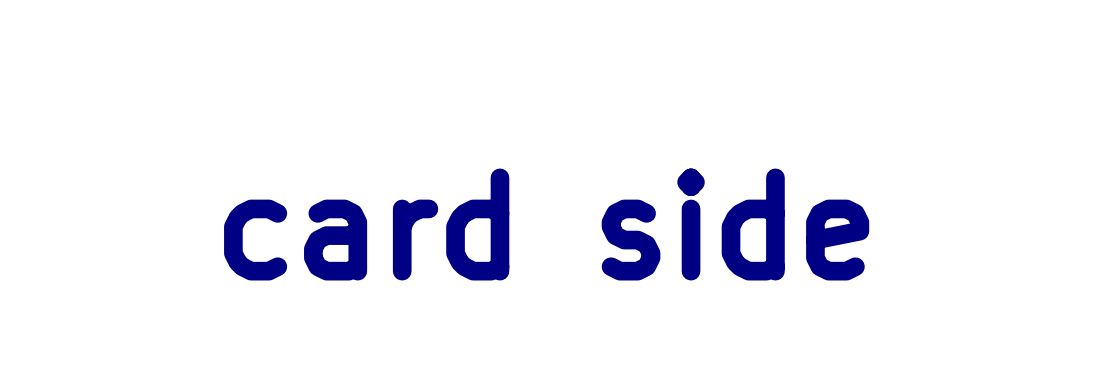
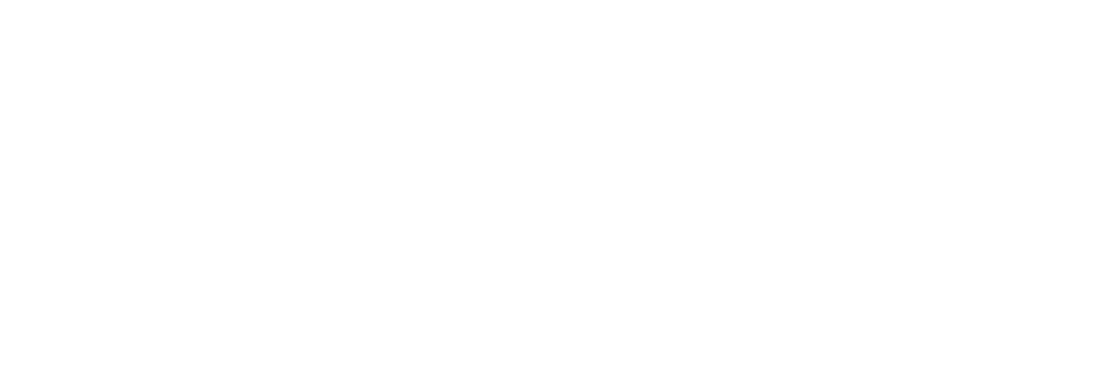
text: card side (546, 224) -> none

